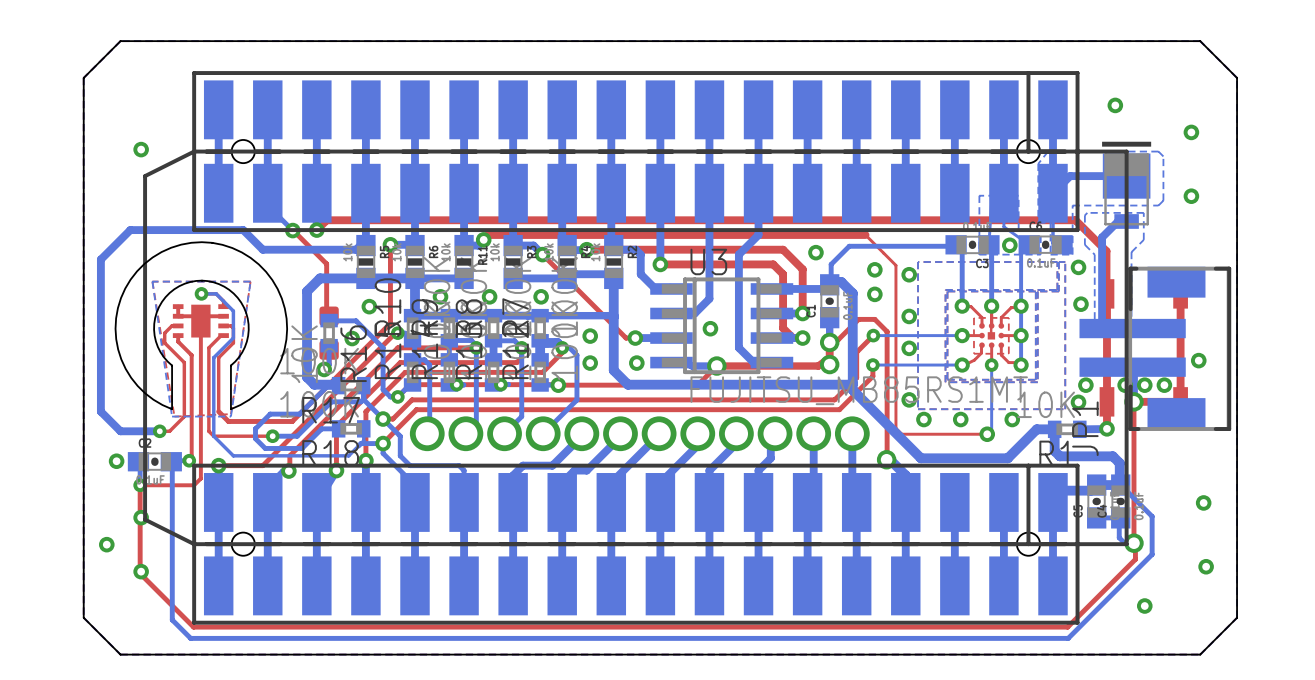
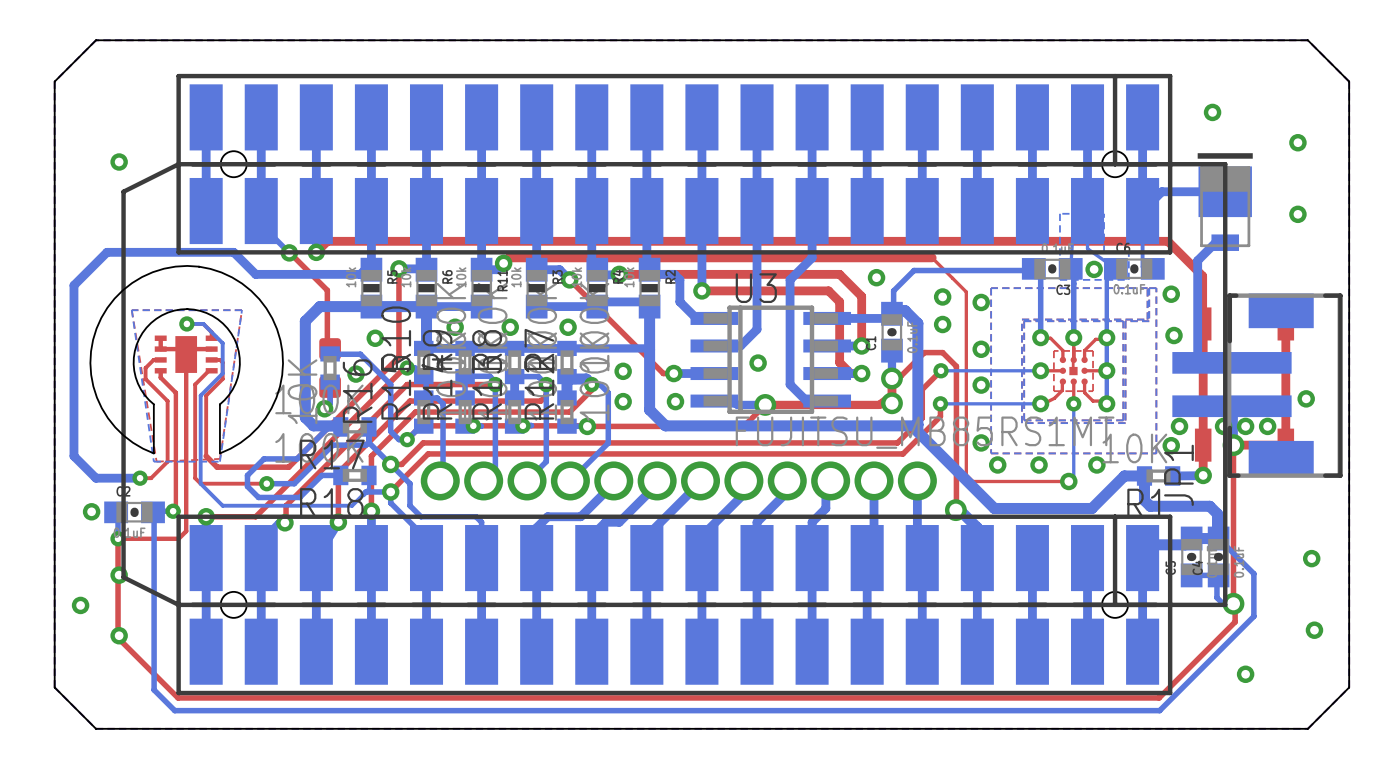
bottom zone outline: (1158, 151) (1163, 156) (1163, 200) (1158, 205) (1072, 205) (1072, 254) (1050, 254) (1050, 222) (1038, 222) (1038, 163) (1048, 151) (1158, 151) -> none
bottom zone outline: (1143, 212) (1087, 212) (1084, 215) (1084, 244) (1094, 254) (1094, 328) (1097, 330) (1129, 330) (1131, 328) (1131, 252) (1143, 239) (1143, 212) -> none

